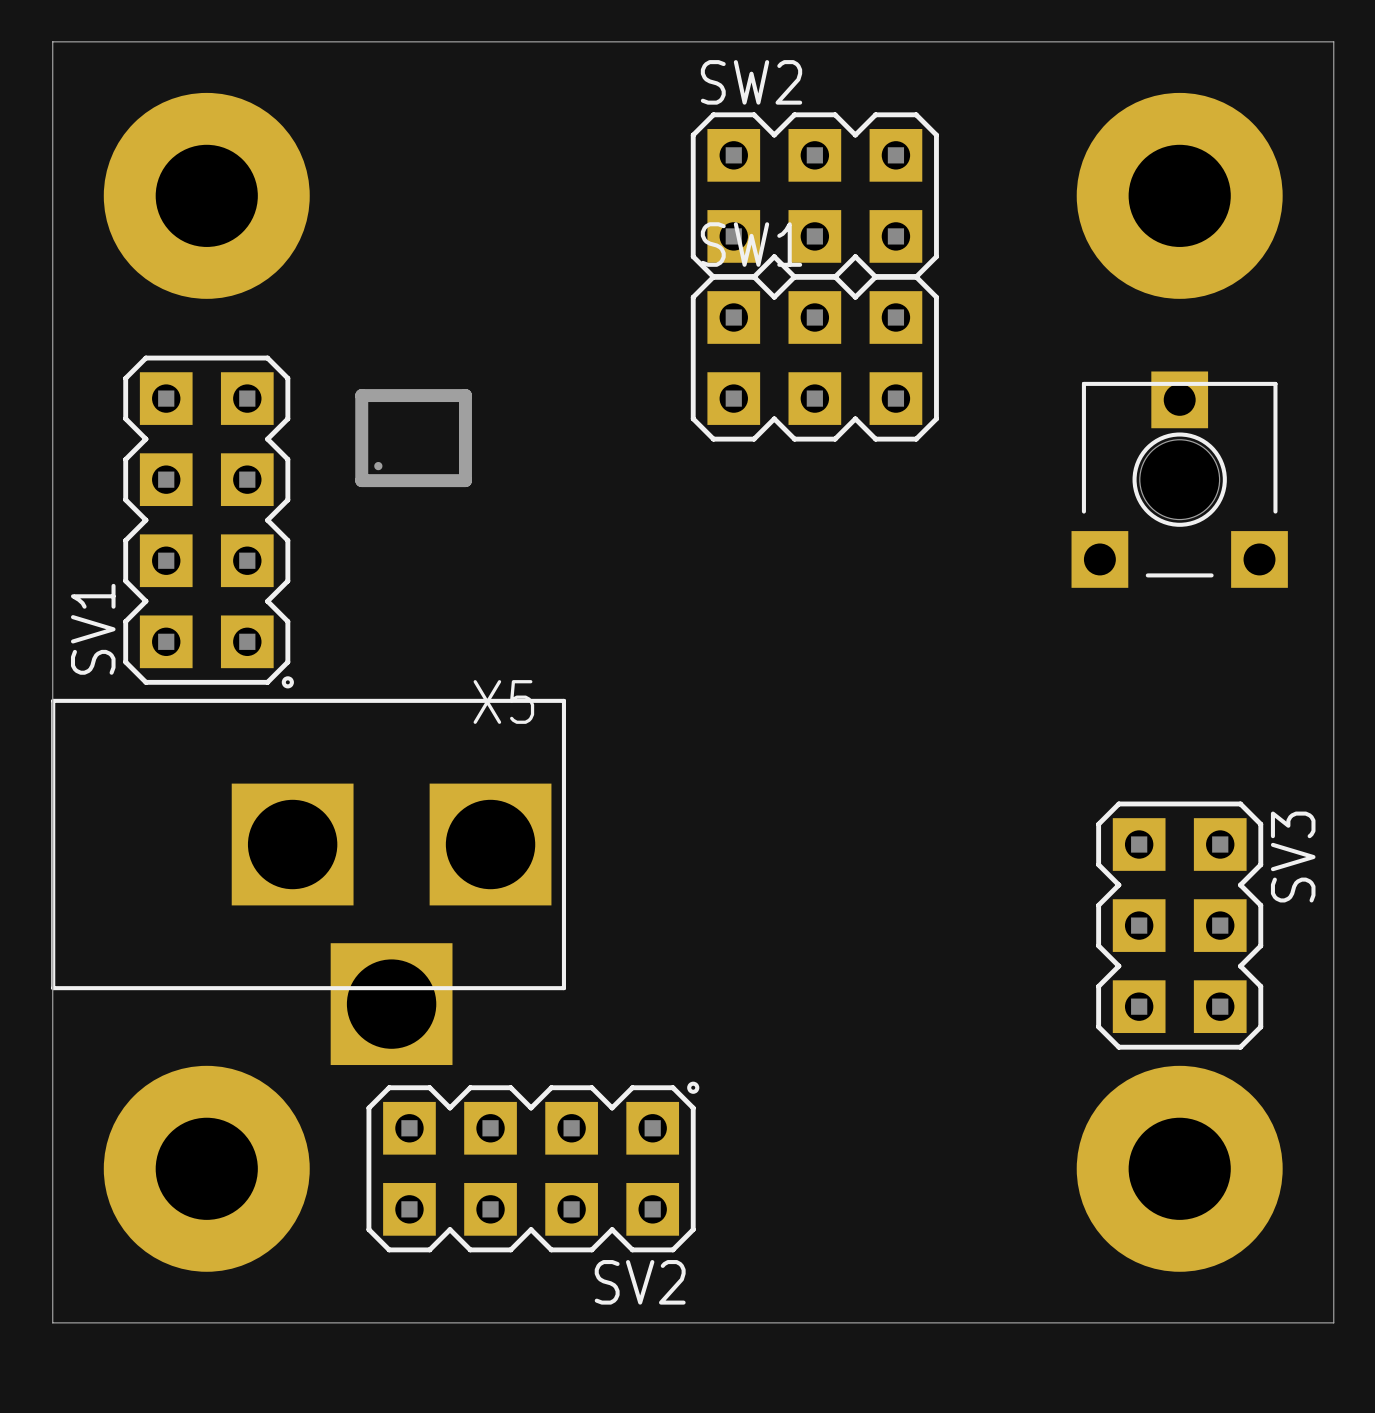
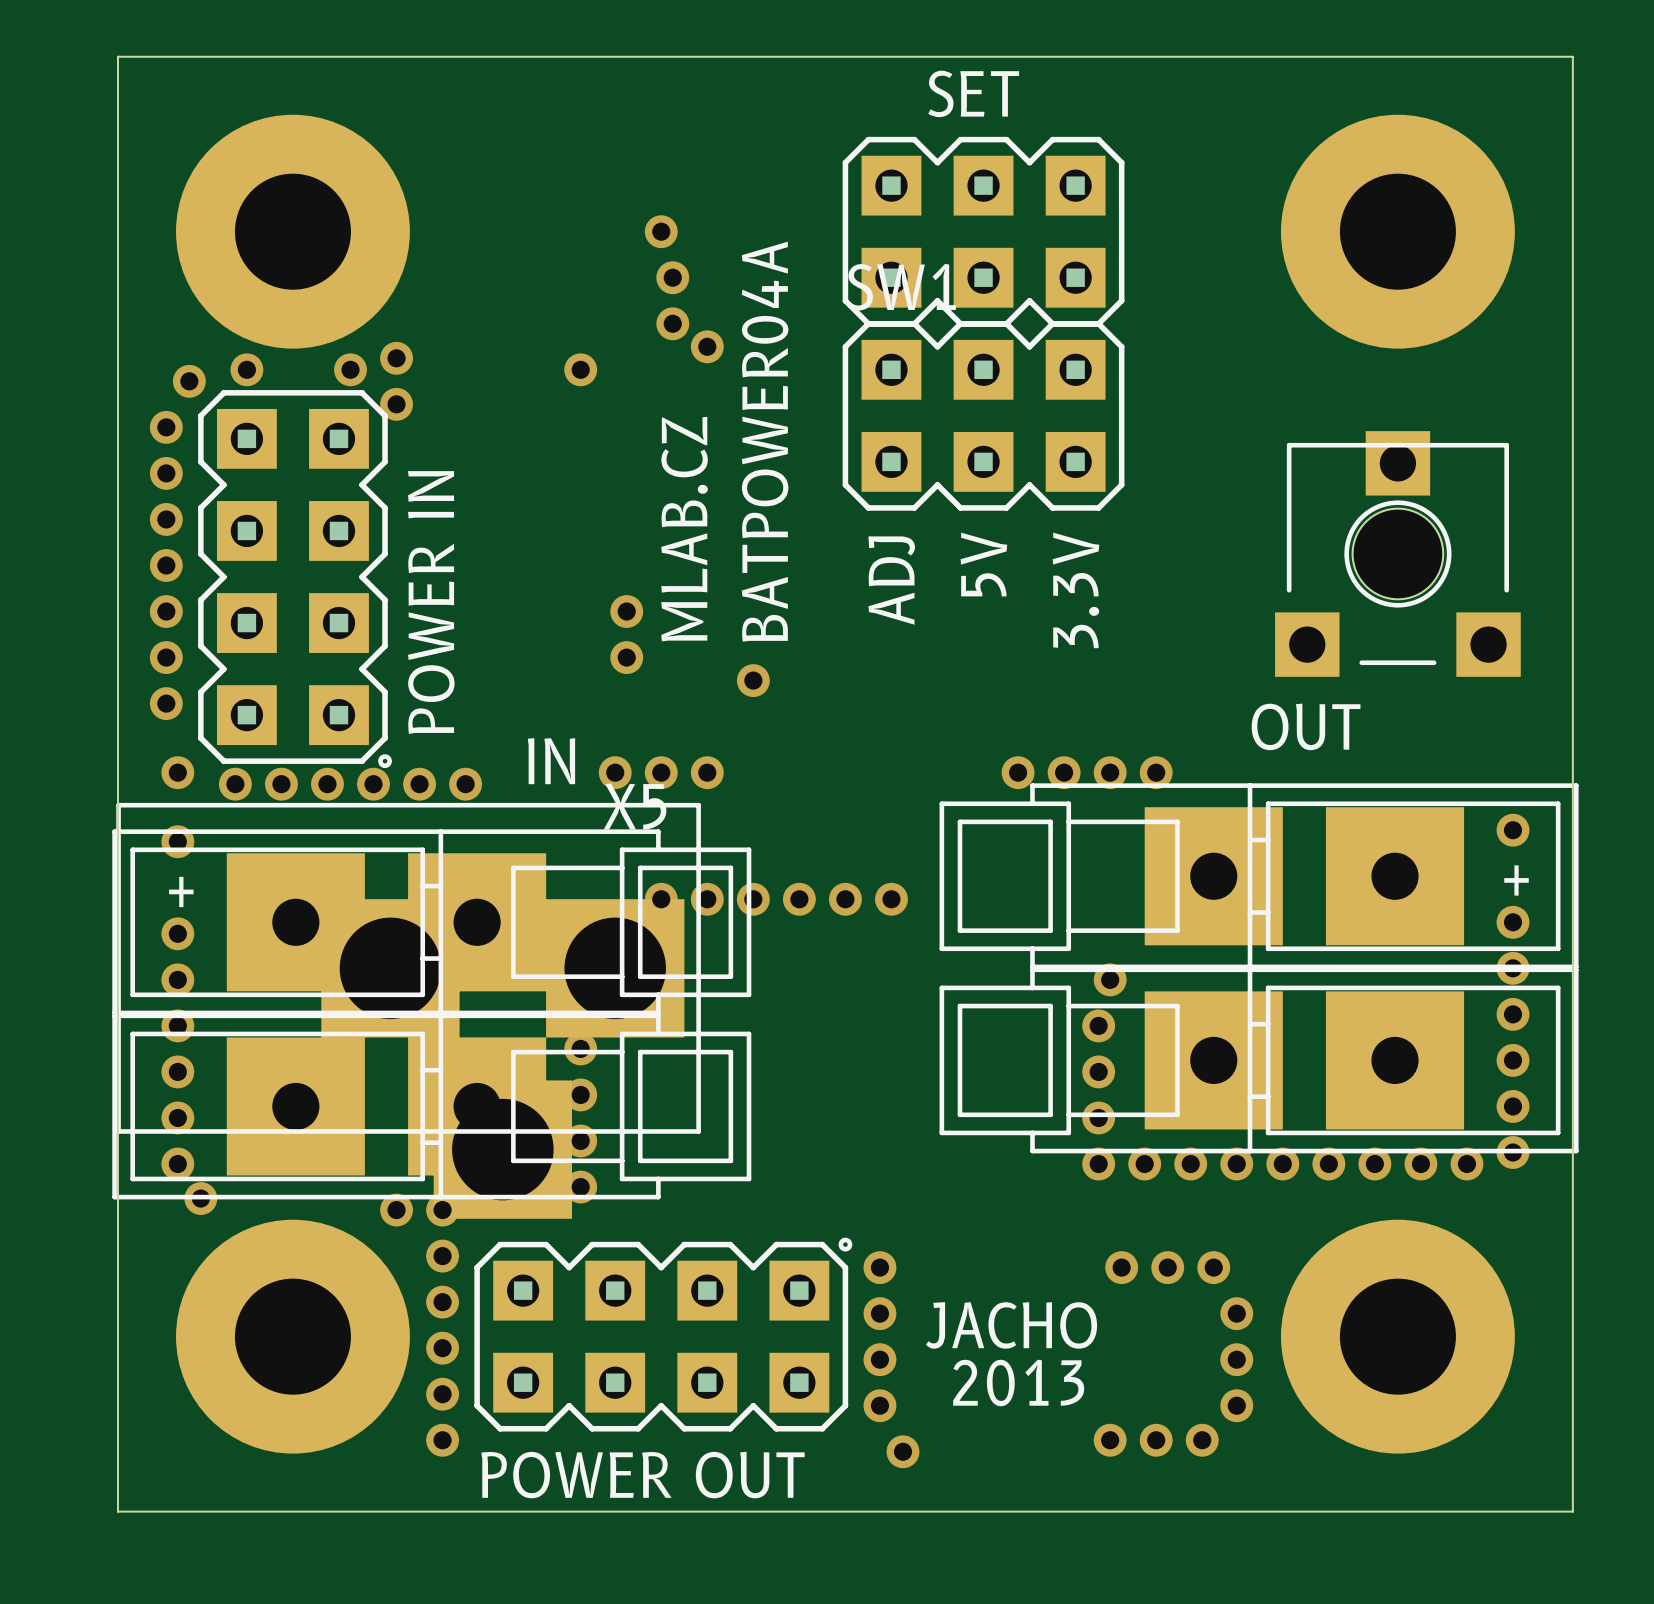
text: none -> SET (973, 93)
SW2 name: SW2 (751, 82) -> none
via: none -> (661, 231)
via: none -> (672, 277)
via: none -> (672, 323)
via: none -> (707, 346)
via: none -> (396, 358)
via: none -> (246, 369)
via: none -> (350, 369)
via: none -> (580, 369)
via: none -> (189, 381)
via: none -> (396, 404)
text: none -> BATPOWER04A (765, 441)
via: none -> (166, 427)
via: none -> (166, 473)
part: (413, 438) -> none
text: none -> MLAB.CZ (684, 529)
via: none -> (166, 519)
via: none -> (166, 565)
text: none -> 5V (983, 564)
text: none -> POWER IN (431, 602)
text: none -> ADJ (891, 580)
text: none -> 3.3V (1075, 590)
SV1 position: (208, 522) -> (295, 579)
via: none -> (166, 611)
via: none -> (626, 611)
via: none -> (166, 657)
via: none -> (626, 657)
via: none -> (753, 680)
via: none -> (166, 703)
SV1 name: SV1 (93, 629) -> none
text: none -> OUT (1306, 726)
text: none -> IN (551, 761)
via: none -> (177, 772)
via: none -> (615, 772)
via: none -> (661, 772)
via: none -> (707, 772)
via: none -> (1018, 772)
via: none -> (1064, 772)
via: none -> (1110, 772)
via: none -> (1156, 772)
via: none -> (235, 784)
via: none -> (281, 784)
via: none -> (327, 784)
via: none -> (373, 784)
via: none -> (419, 784)
via: none -> (465, 784)
via: none -> (1513, 830)
via: none -> (177, 841)
part: none -> (1259, 876)
text: none -> + (1516, 880)
text: none -> + (181, 891)
via: none -> (661, 899)
via: none -> (707, 899)
via: none -> (753, 899)
via: none -> (799, 899)
via: none -> (845, 899)
via: none -> (891, 899)
part: none -> (431, 922)
via: none -> (1513, 922)
via: none -> (177, 933)
via: none -> (1513, 968)
via: none -> (177, 979)
via: none -> (1110, 979)
via: none -> (1513, 1014)
via: none -> (177, 1025)
via: none -> (1098, 1025)
via: none -> (580, 1048)
part: none -> (1259, 1060)
SV3: (1179, 925) -> none
via: none -> (1513, 1060)
via: none -> (177, 1071)
via: none -> (1098, 1071)
via: none -> (580, 1094)
part: none -> (431, 1106)
via: none -> (1513, 1106)
via: none -> (177, 1117)
via: none -> (1098, 1117)
via: none -> (580, 1140)
via: none -> (1513, 1152)
via: none -> (177, 1164)
via: none -> (1098, 1164)
via: none -> (1144, 1164)
via: none -> (1190, 1164)
via: none -> (1236, 1164)
via: none -> (1282, 1164)
via: none -> (1328, 1164)
via: none -> (1374, 1164)
via: none -> (1420, 1164)
via: none -> (1466, 1164)
via: none -> (580, 1187)
via: none -> (200, 1198)
via: none -> (396, 1210)
via: none -> (442, 1210)
via: none -> (442, 1256)
via: none -> (879, 1267)
via: none -> (1121, 1267)
via: none -> (1167, 1267)
via: none -> (1213, 1267)
via: none -> (442, 1302)
via: none -> (879, 1313)
via: none -> (1236, 1313)
text: none -> JACHO (1011, 1325)
via: none -> (442, 1348)
via: none -> (879, 1359)
via: none -> (1236, 1359)
text: none -> 2013 (1018, 1382)
via: none -> (442, 1394)
via: none -> (879, 1405)
via: none -> (1236, 1405)
via: none -> (442, 1440)
via: none -> (1110, 1440)
via: none -> (1156, 1440)
via: none -> (1202, 1440)
via: none -> (902, 1451)
SV2 name: SV2 (640, 1282) -> none
text: none -> POWER OUT (642, 1475)

